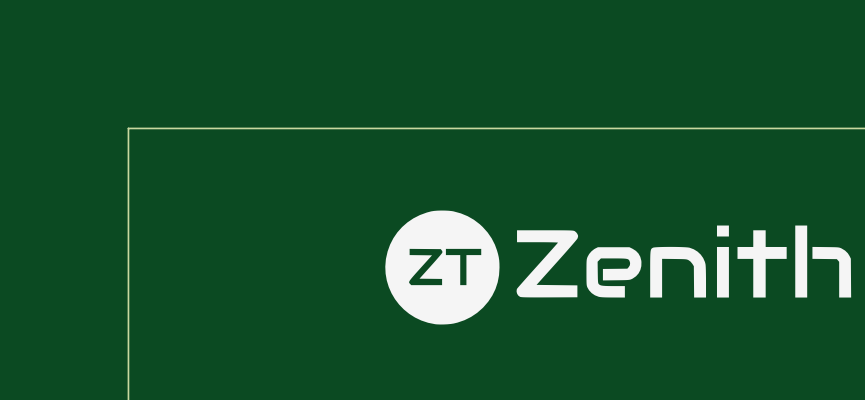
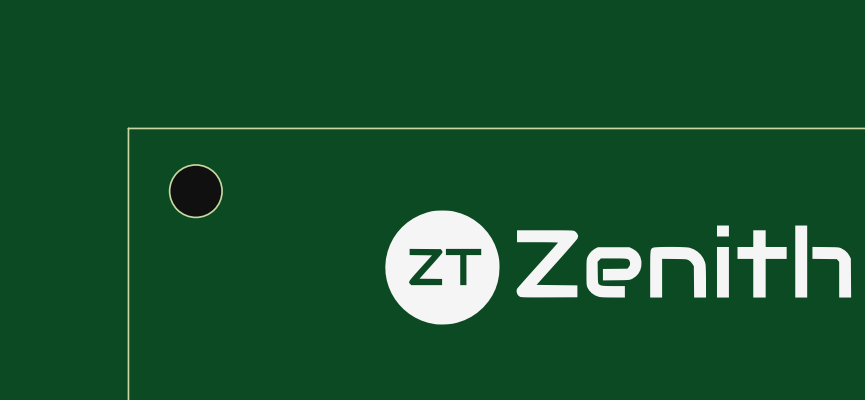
part: none -> (195, 191)

